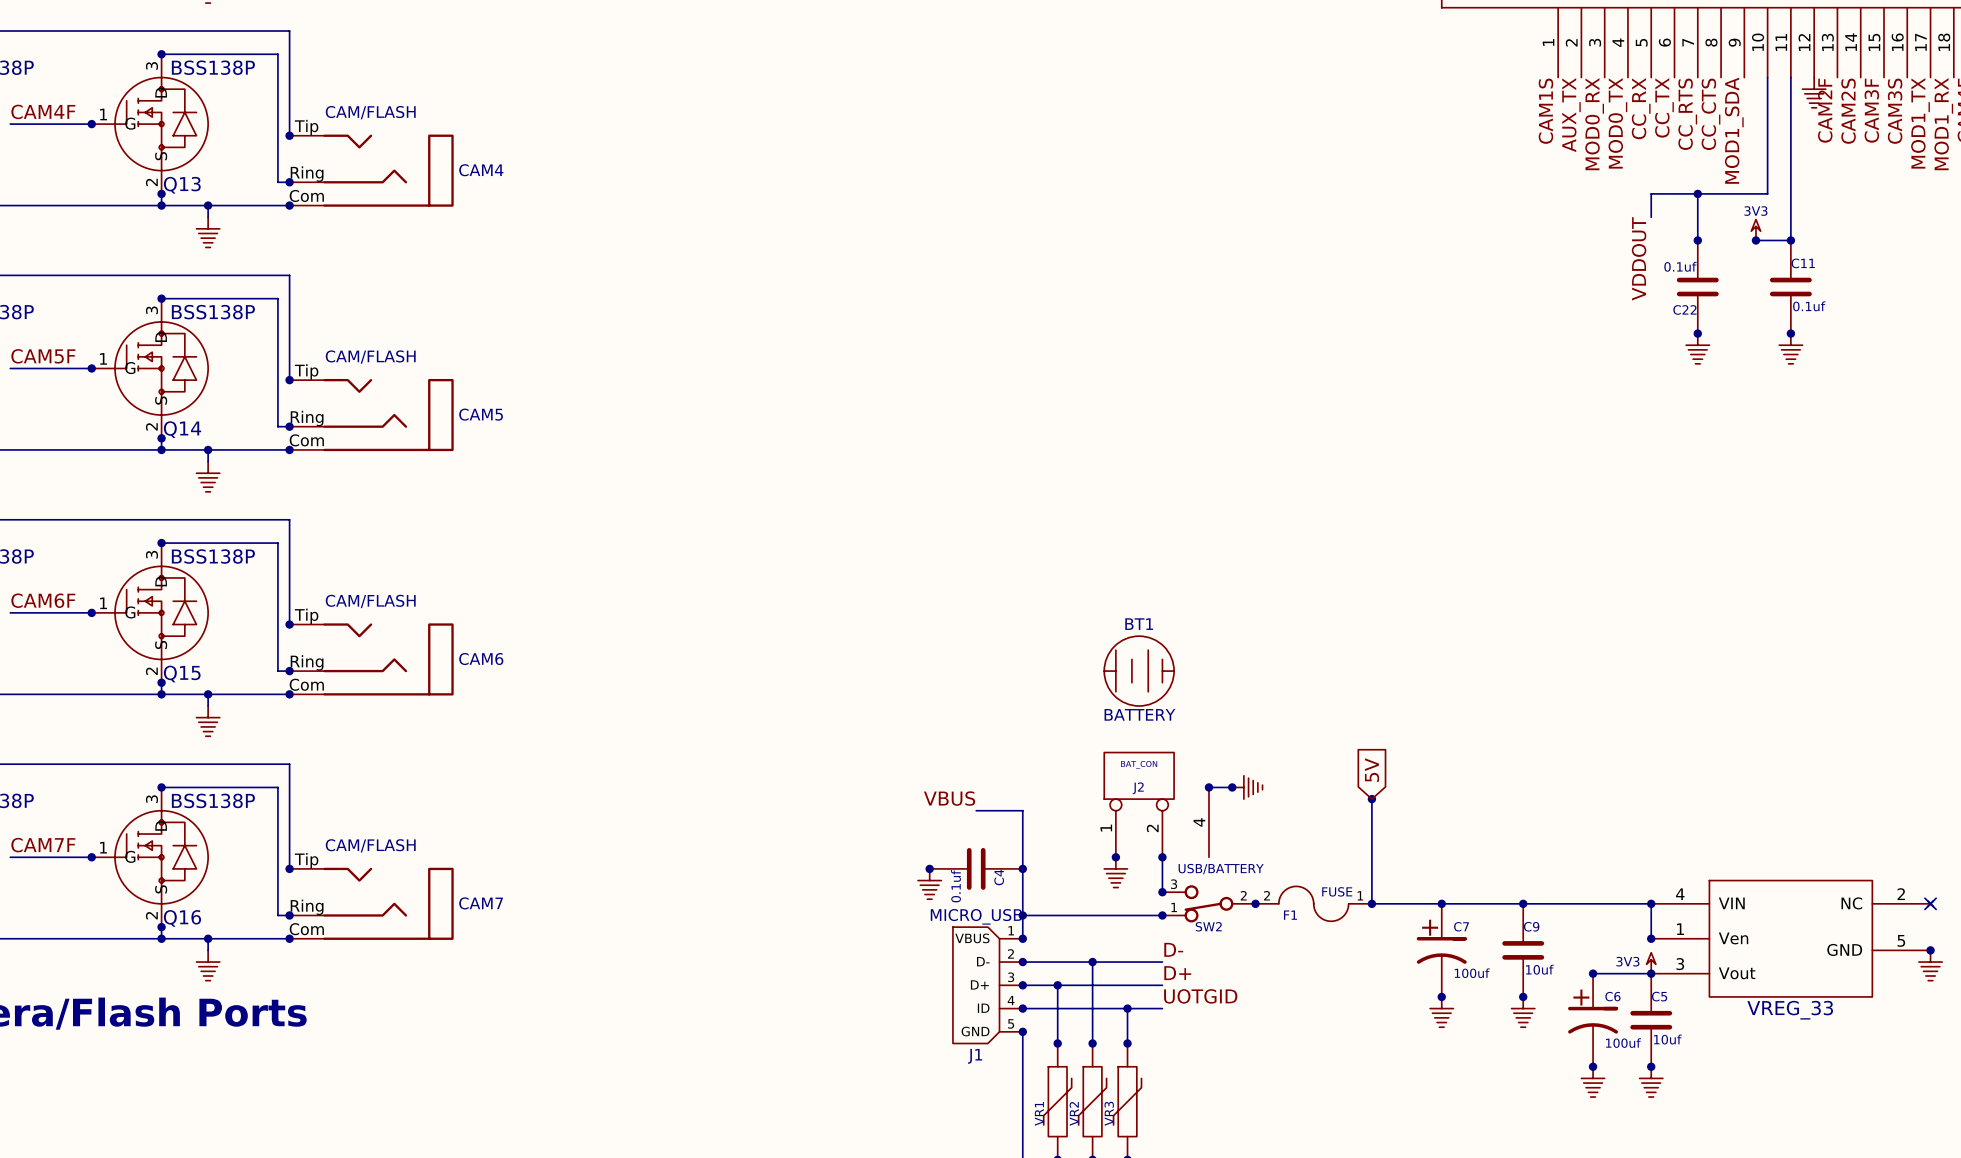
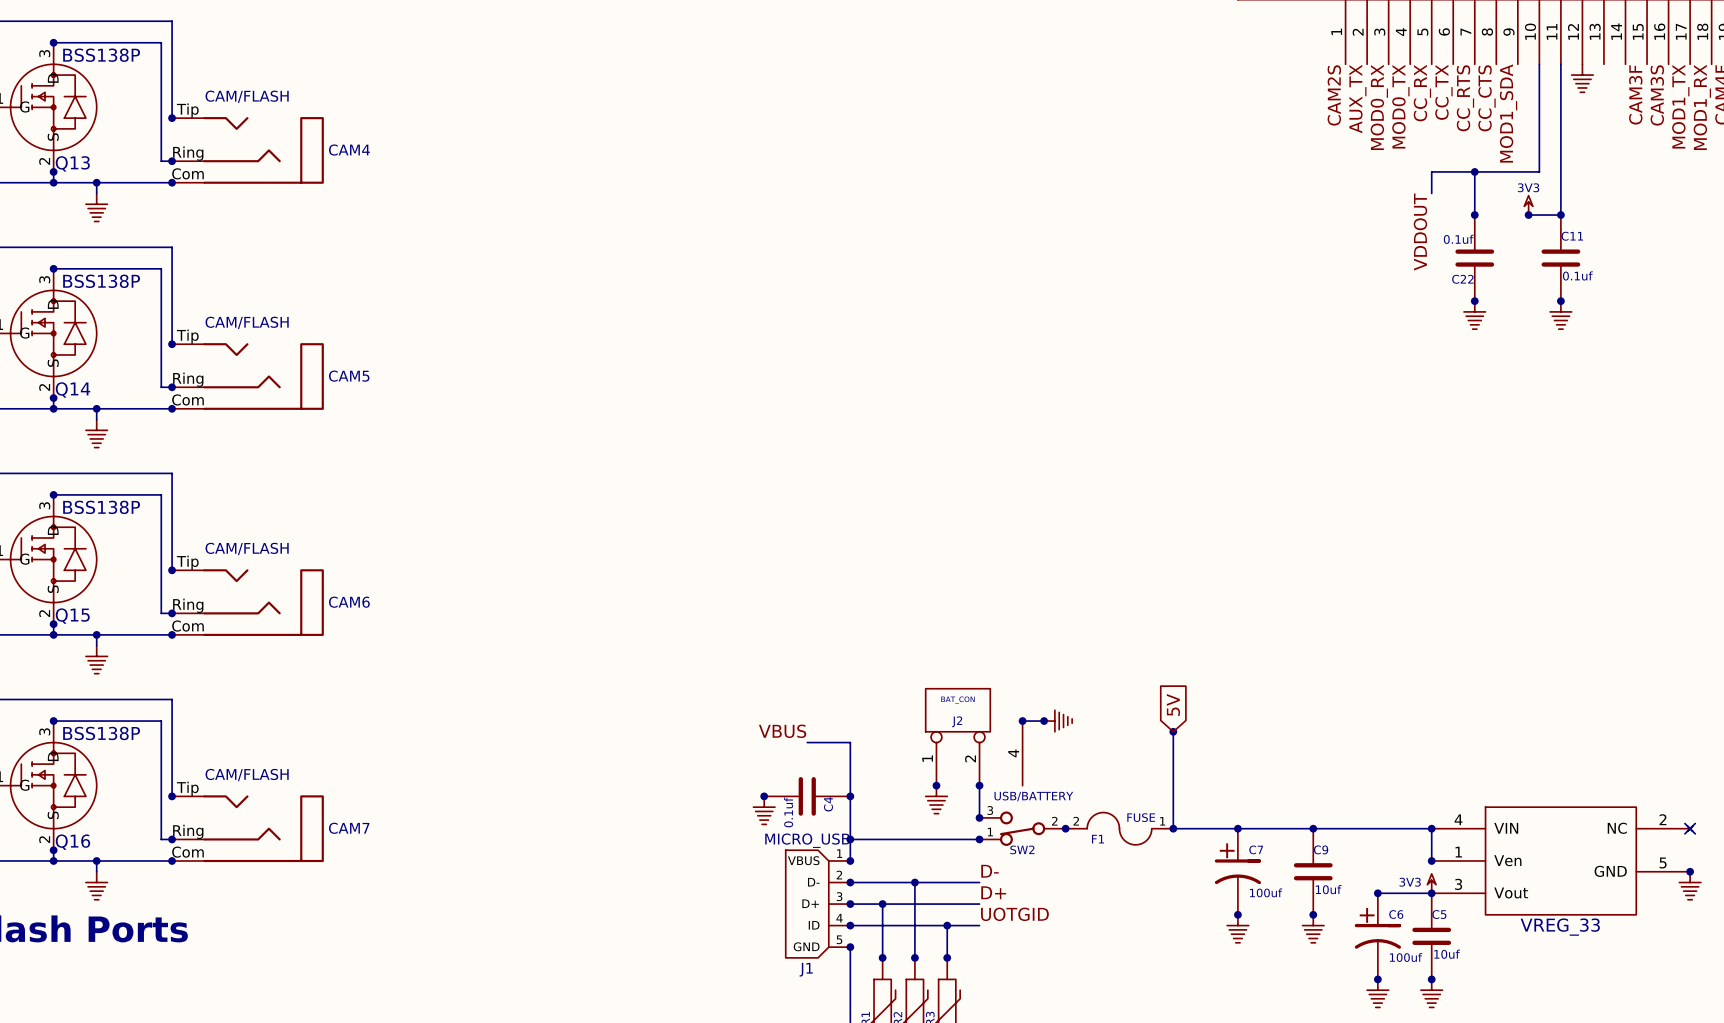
label: CAM2F (1825, 110) -> none
label: CAM1S (1545, 111) -> CAM2S (1334, 95)
label: CAM2S (1848, 111) -> none
BT1: BATTERY (1139, 671) -> none

